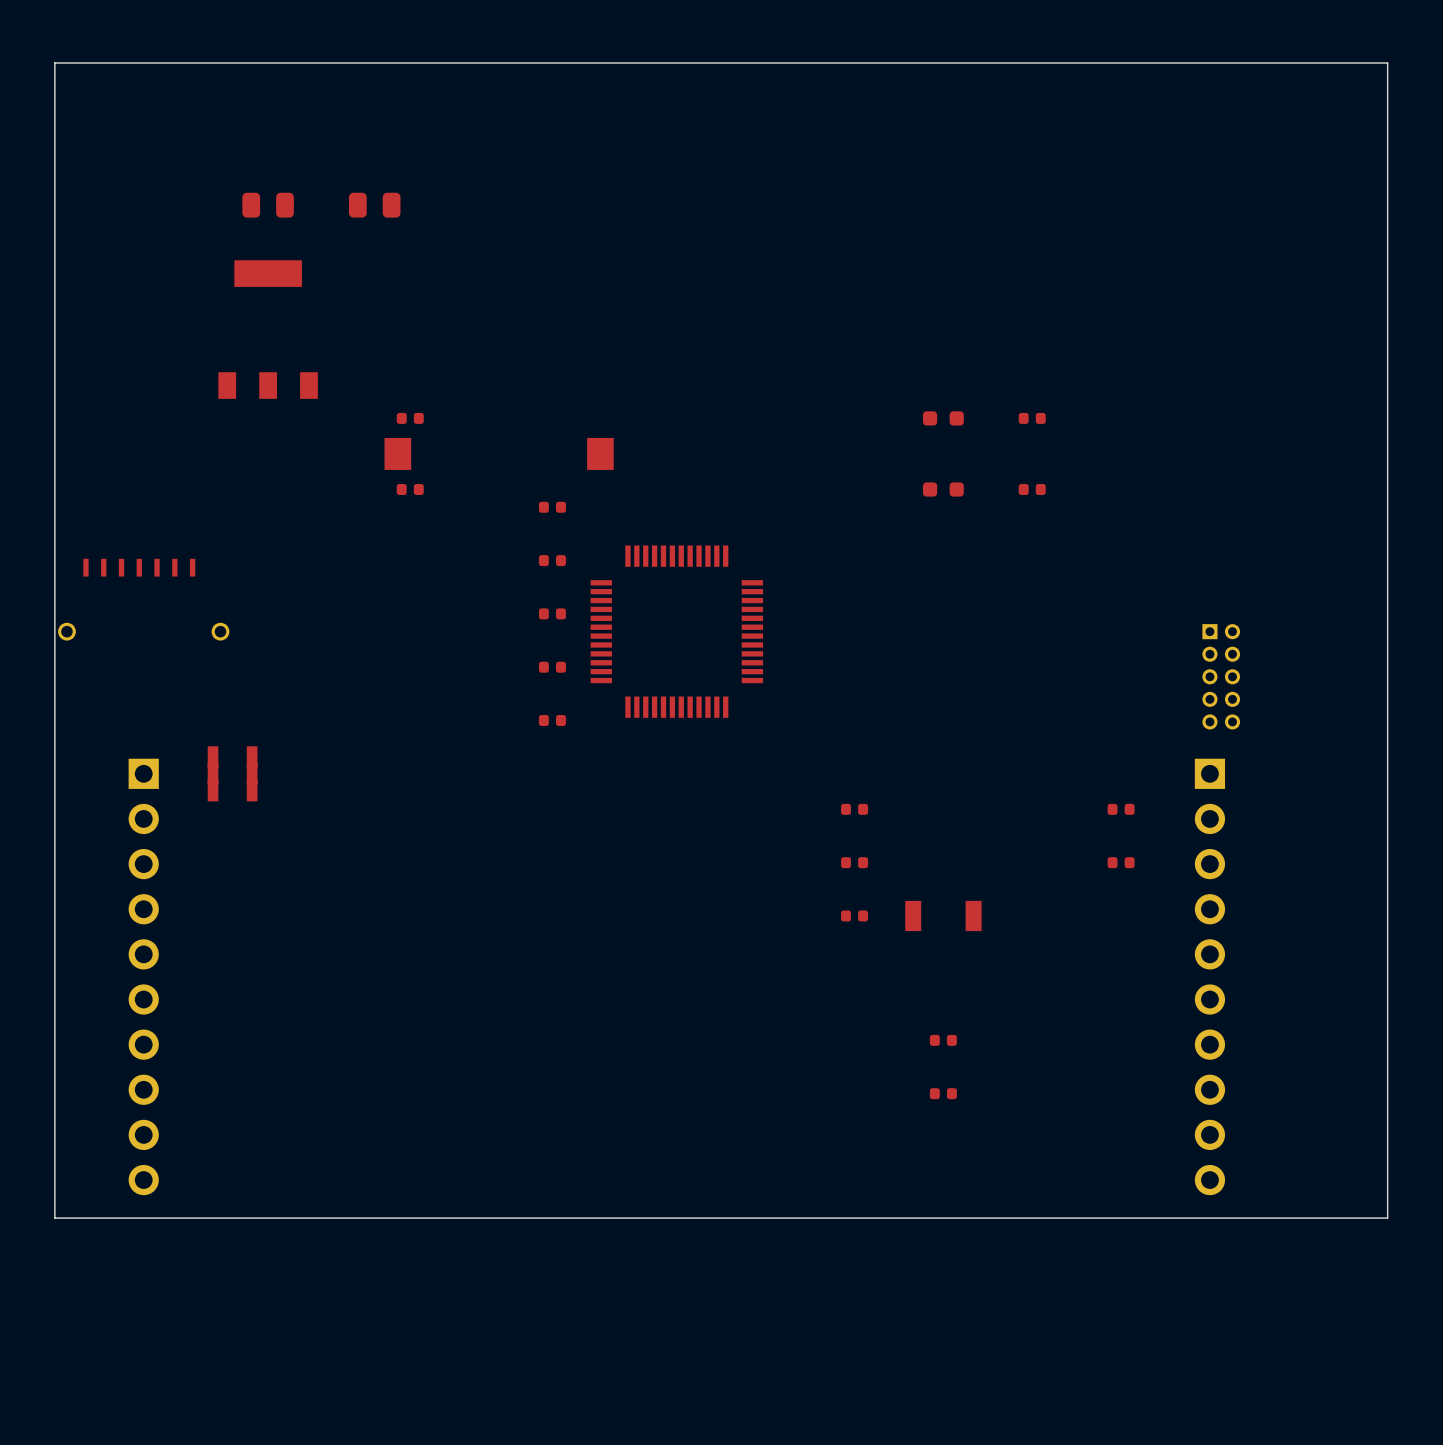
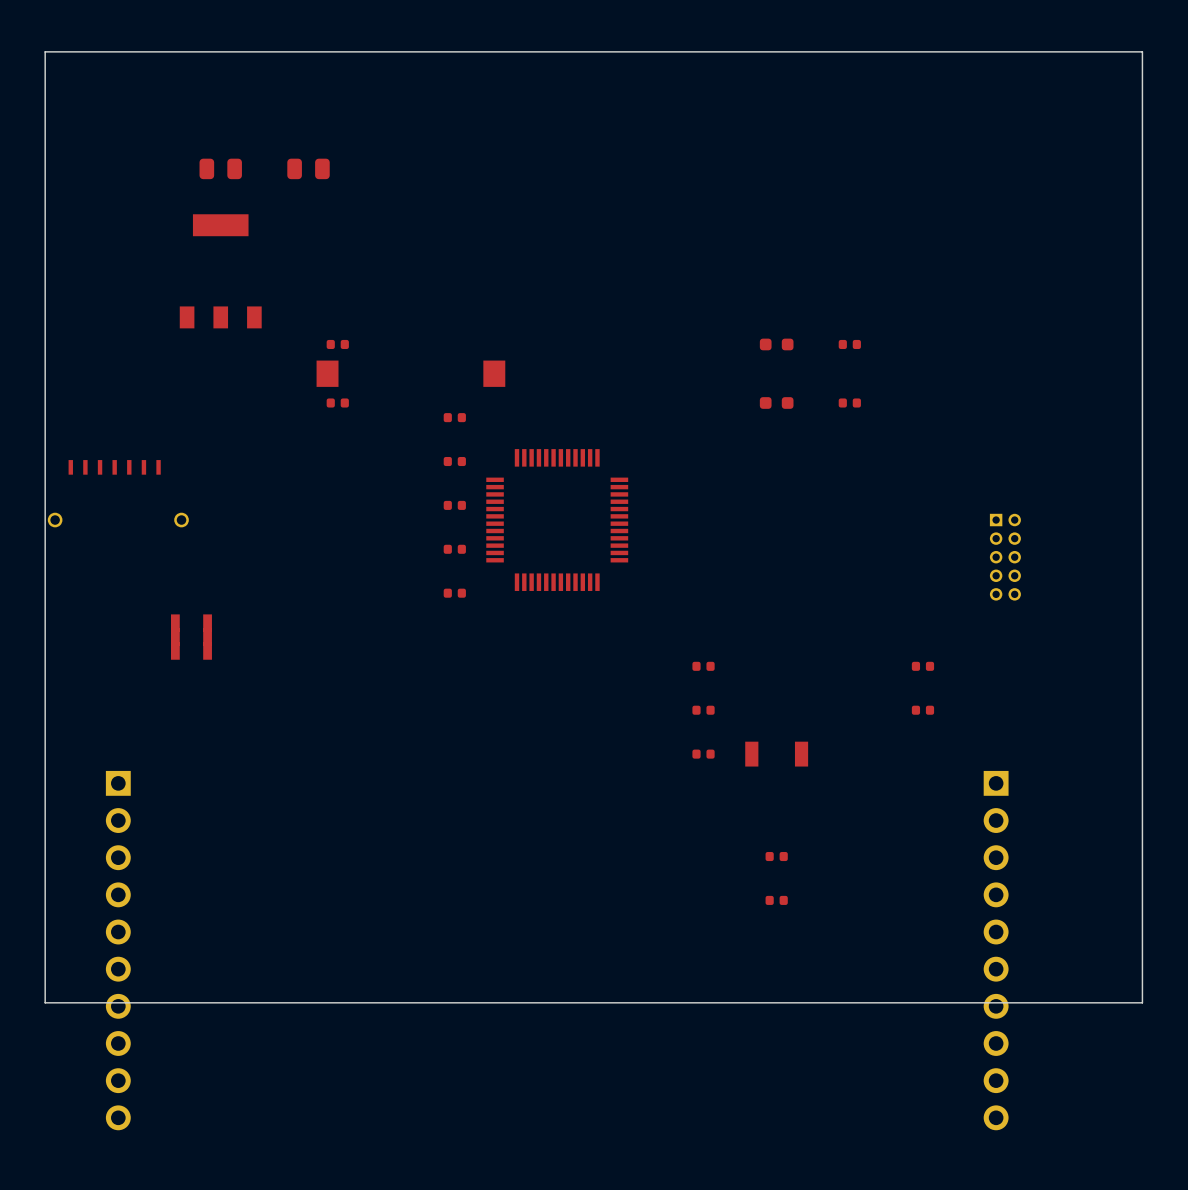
part position: (143, 976) -> (118, 950)
part position: (1209, 976) -> (996, 950)

